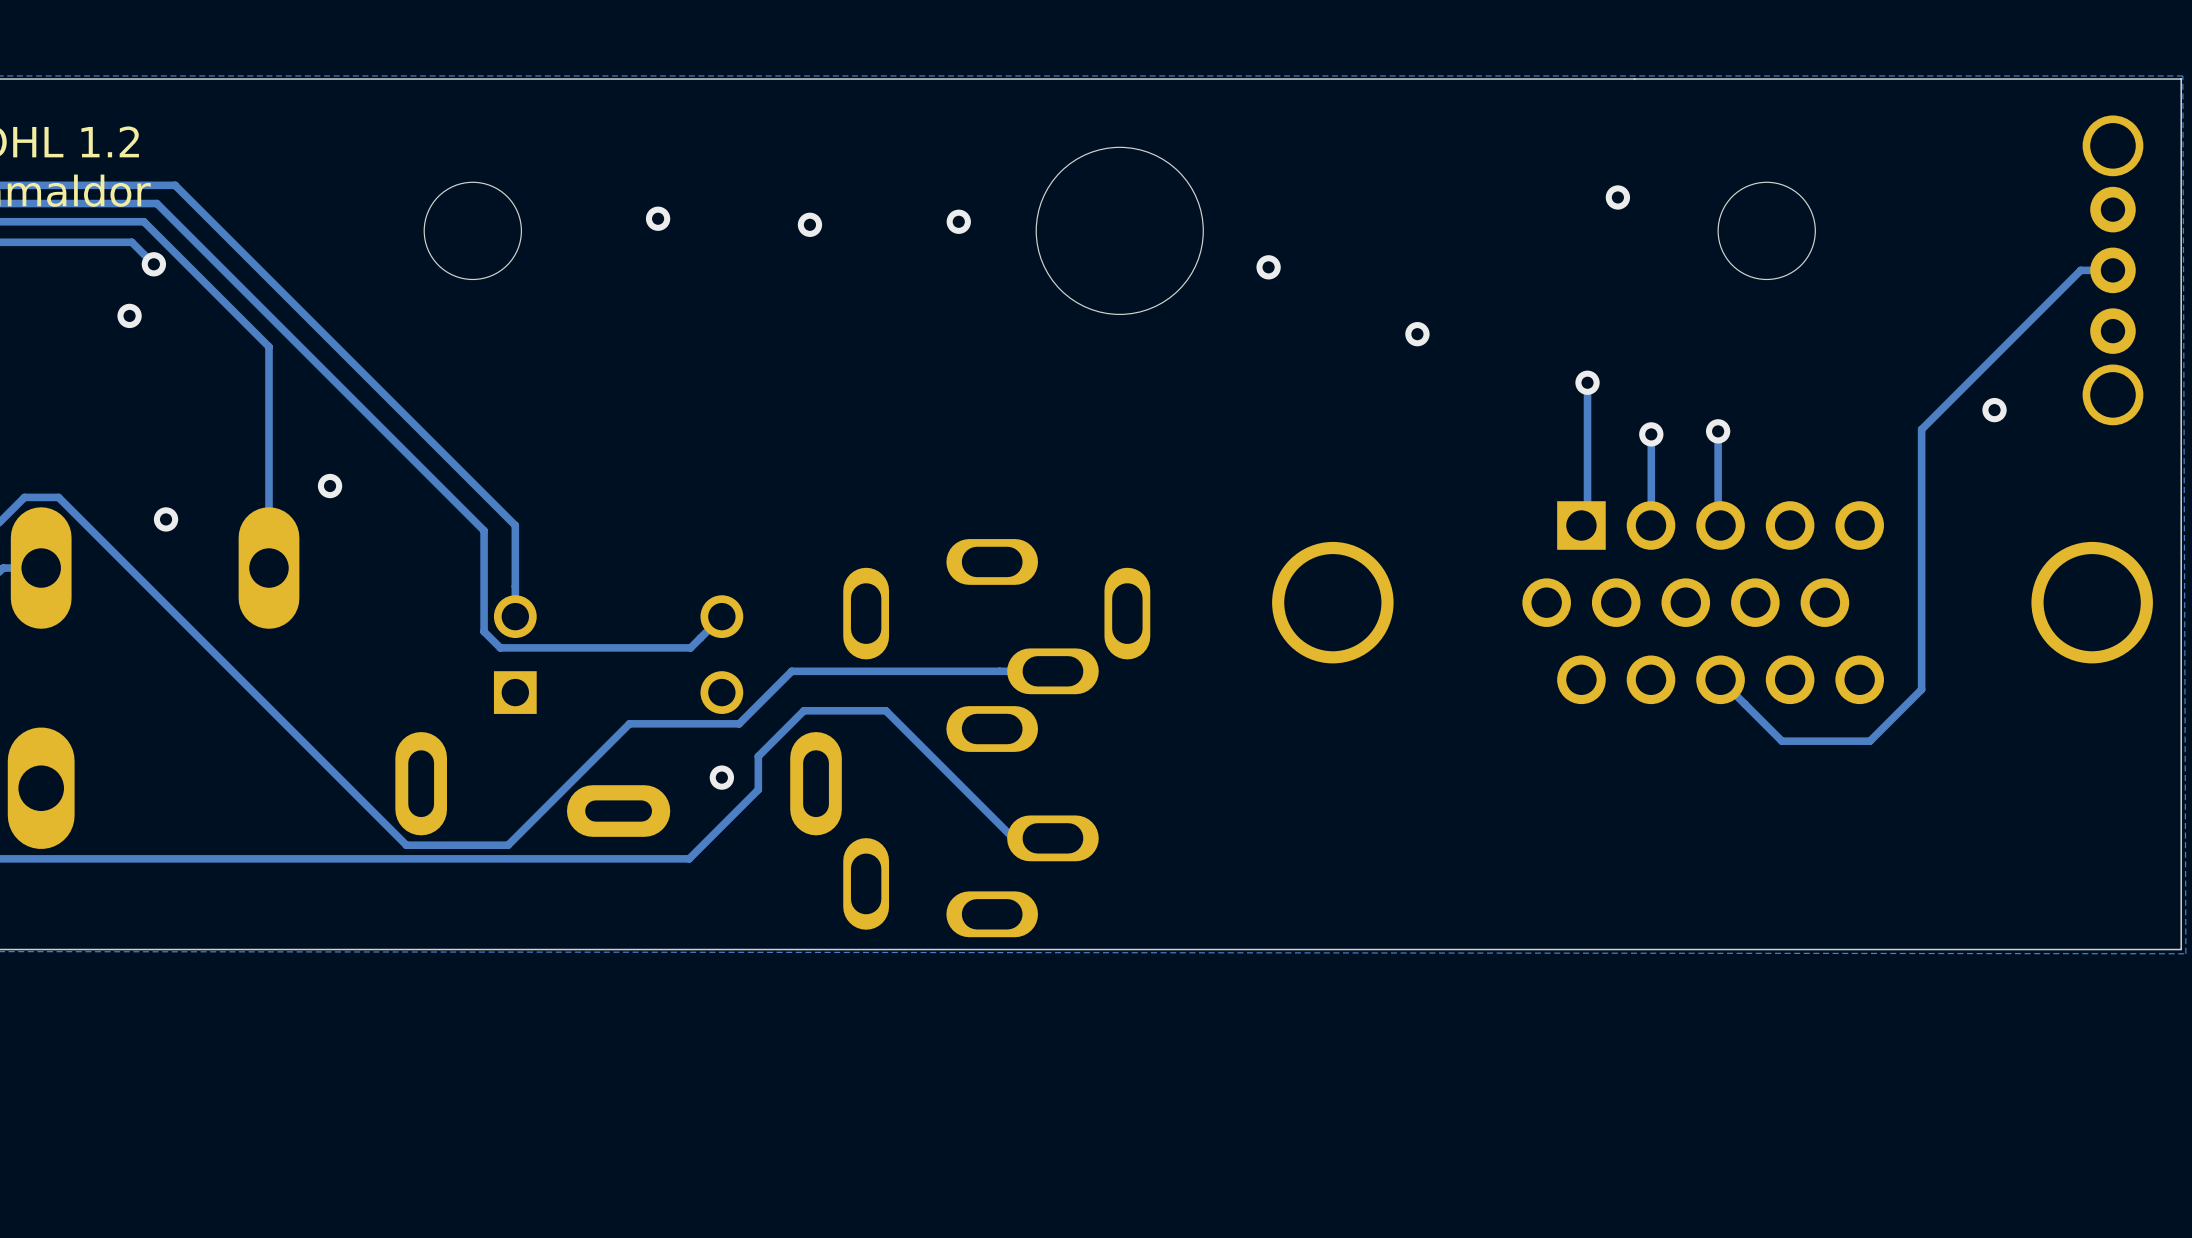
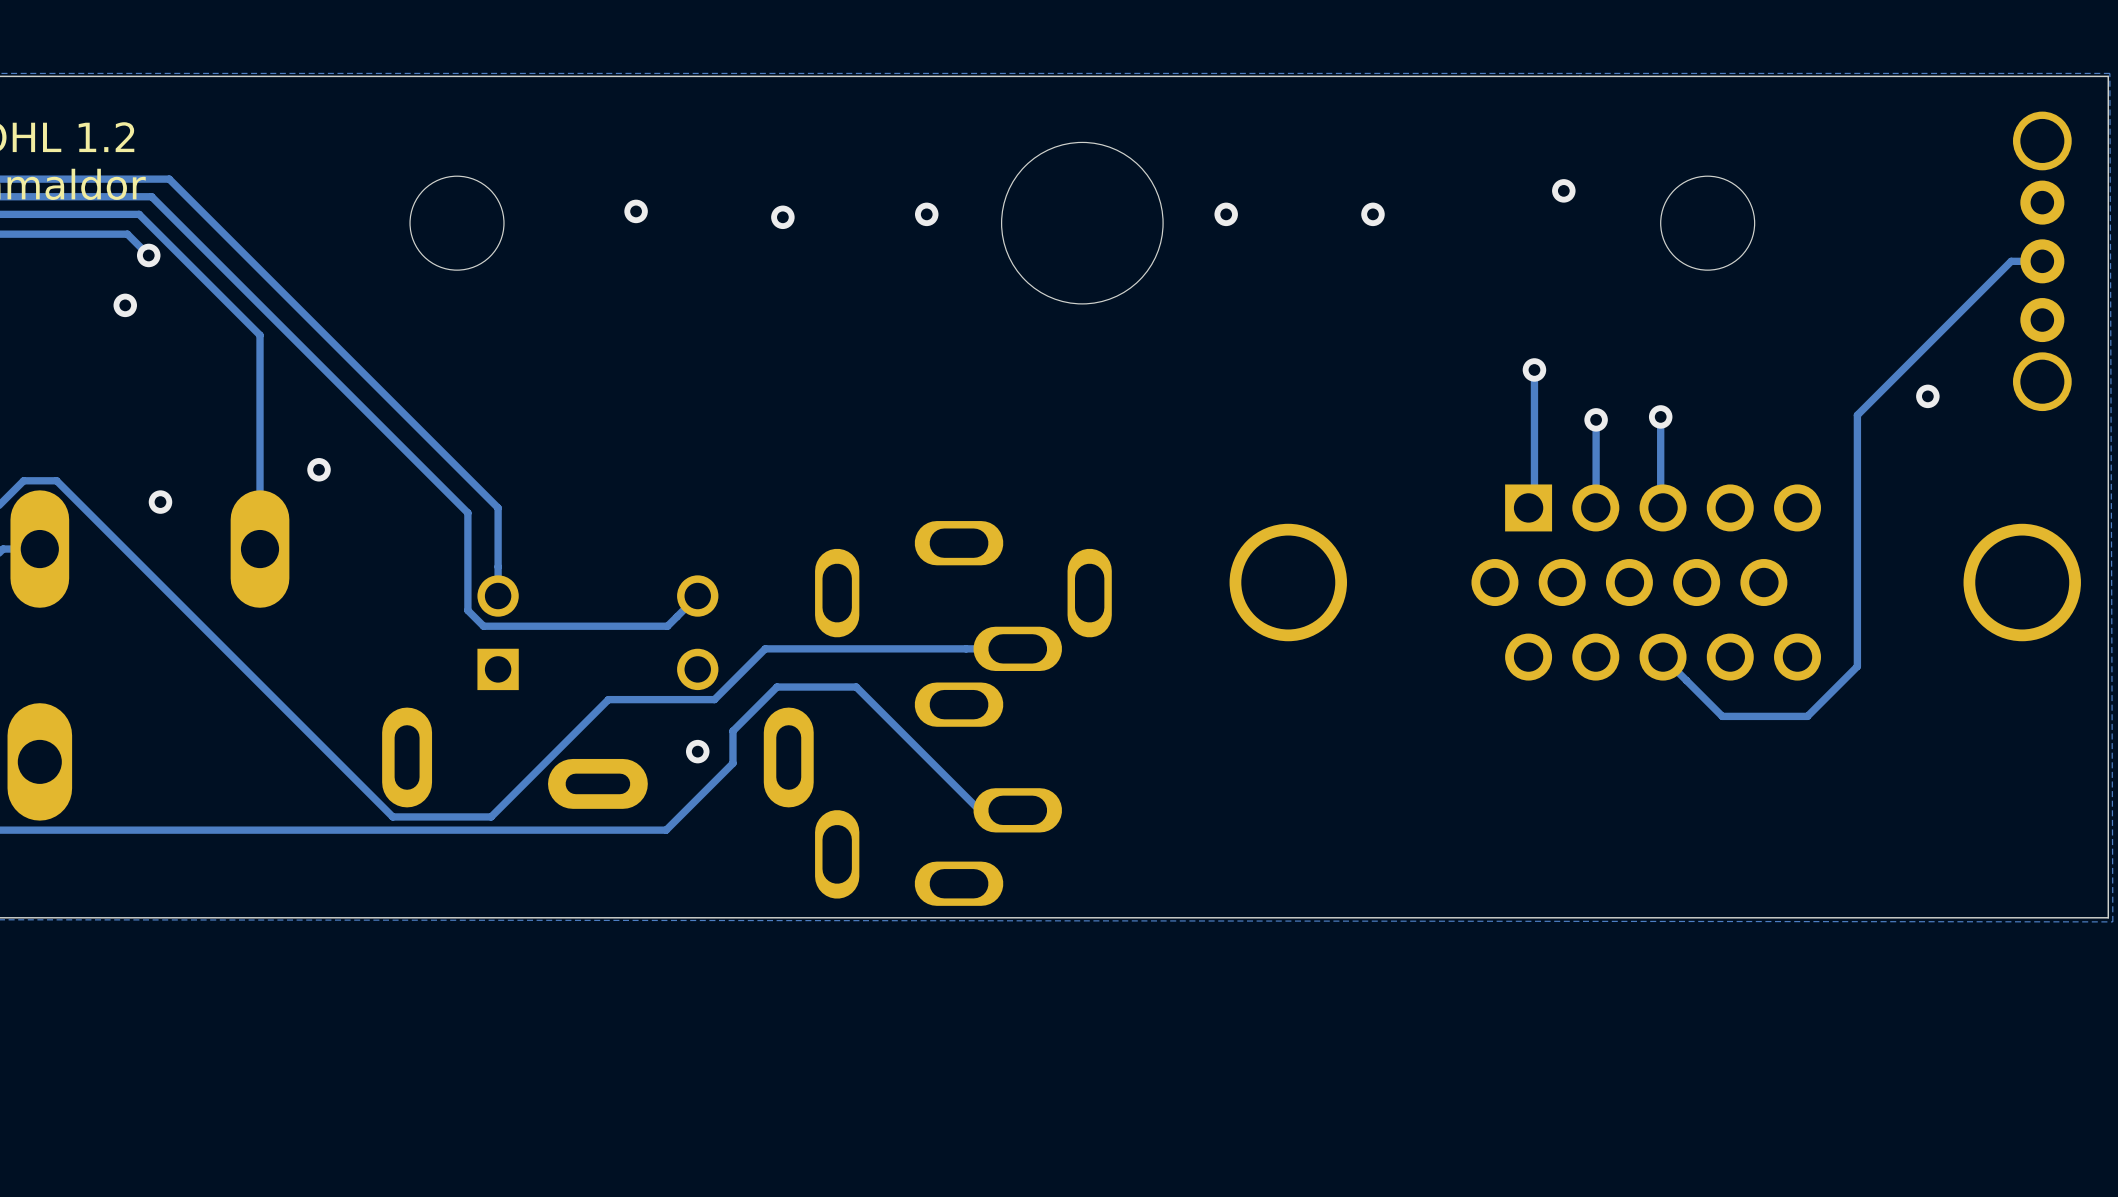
via: none -> (1372, 214)
via position: (1268, 267) -> (1226, 214)
via: (1417, 334) -> none

